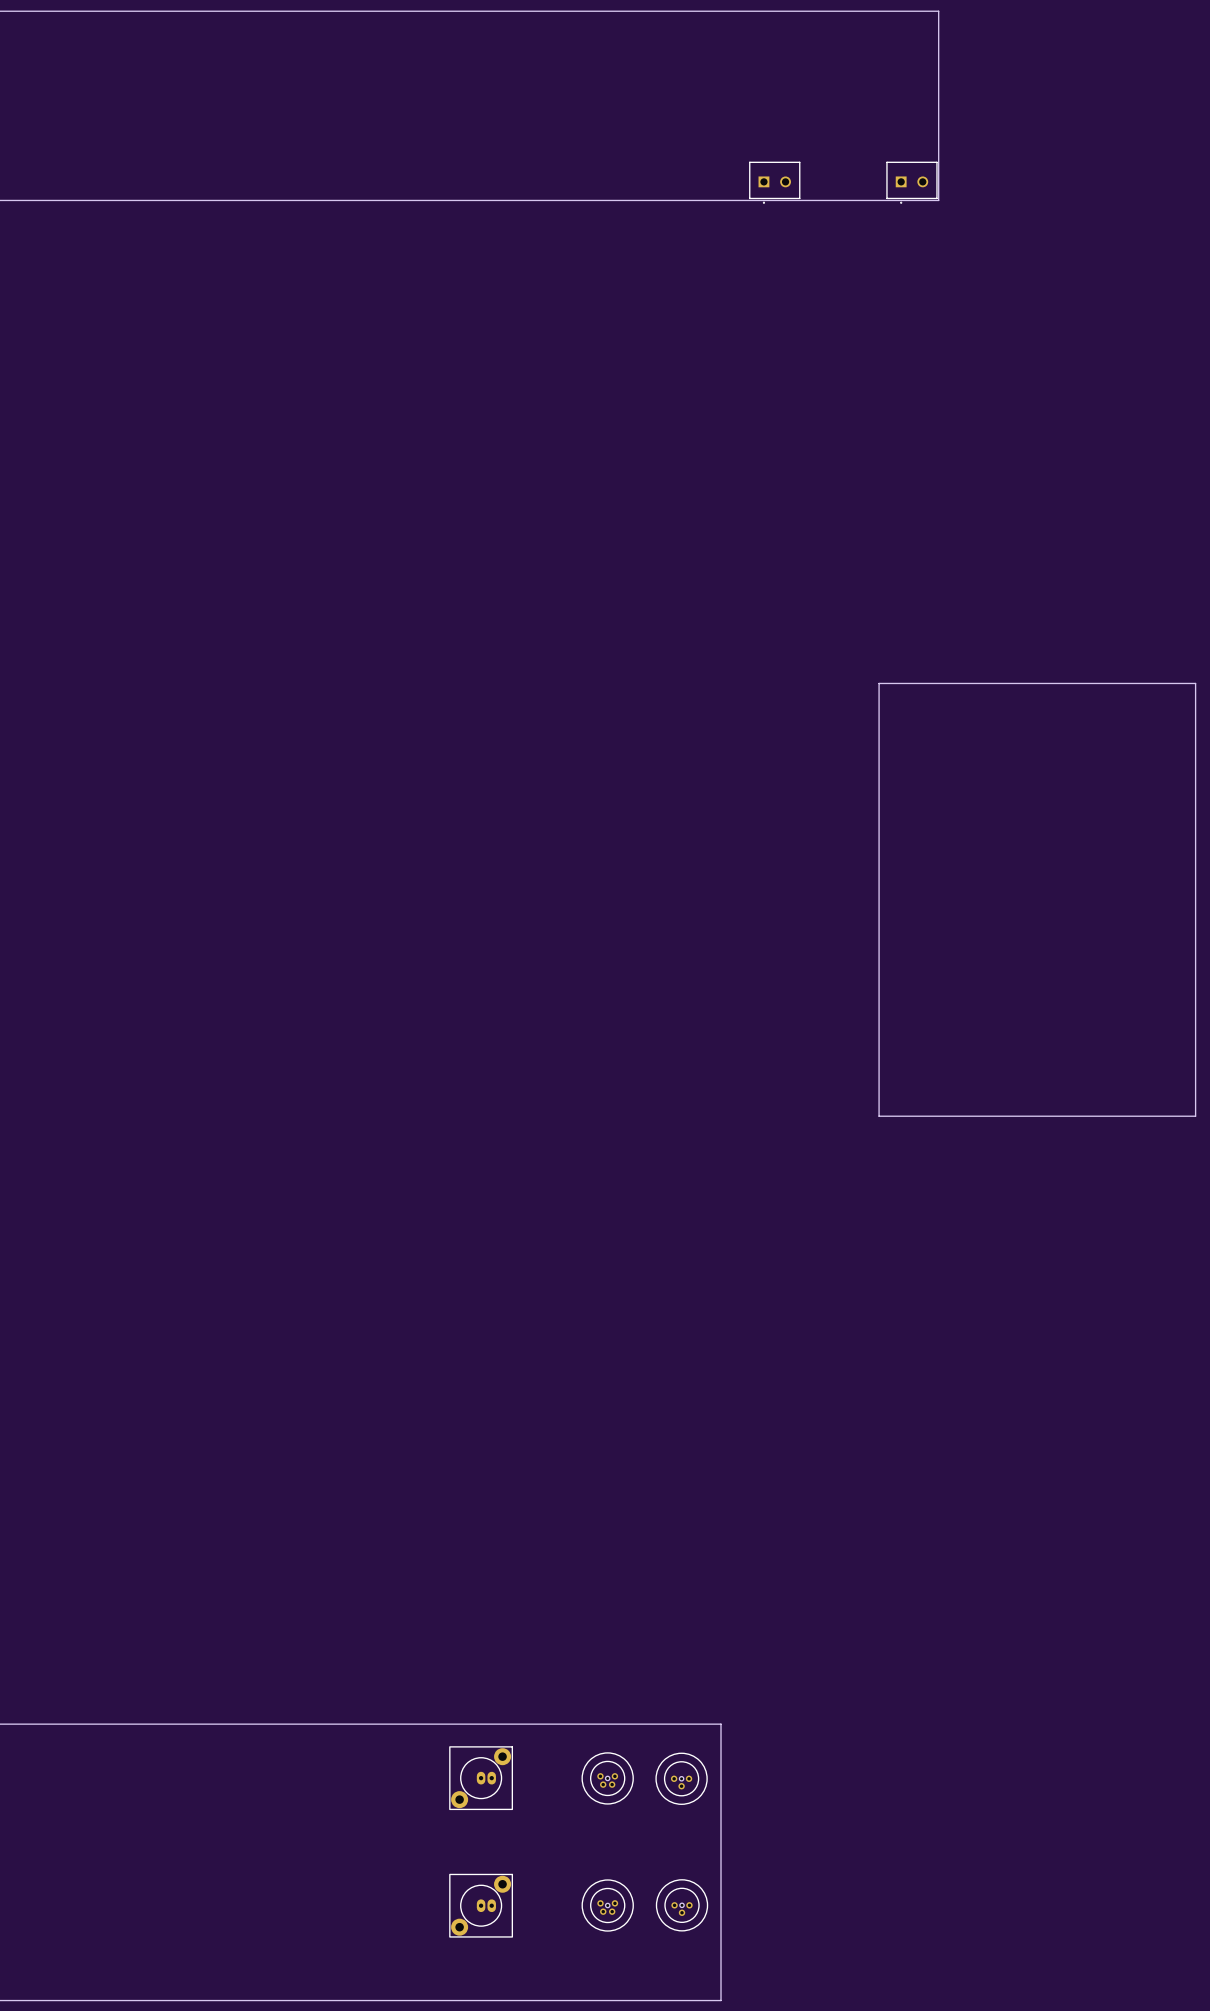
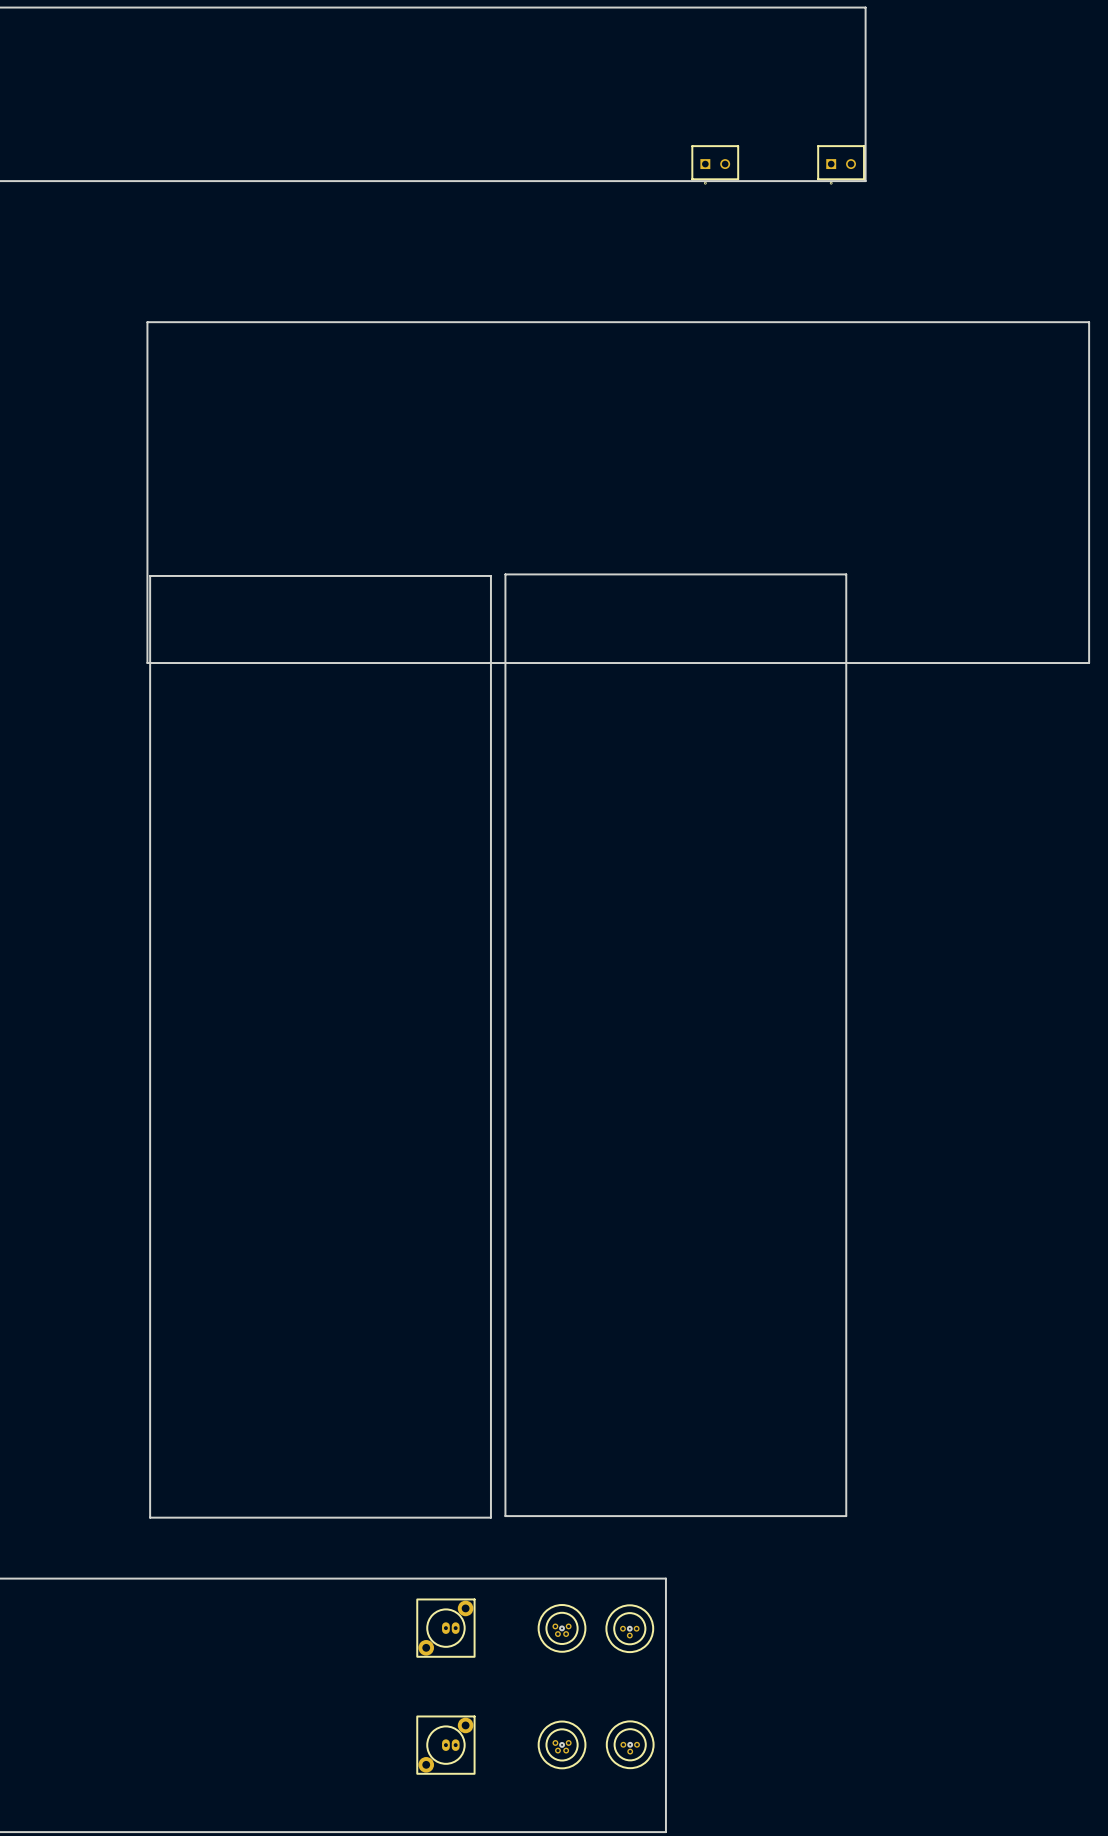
board edge: none -> (147, 322) (1089, 322) (1089, 663) (147, 663) (147, 322)
board edge: none -> (505, 574) (846, 574) (846, 1516) (505, 1516) (505, 574)
board edge: none -> (150, 575) (490, 575) (490, 1517) (150, 1517) (150, 575)
board edge: (879, 683) (1195, 683) (1195, 1116) (879, 1116) (879, 683) -> none

